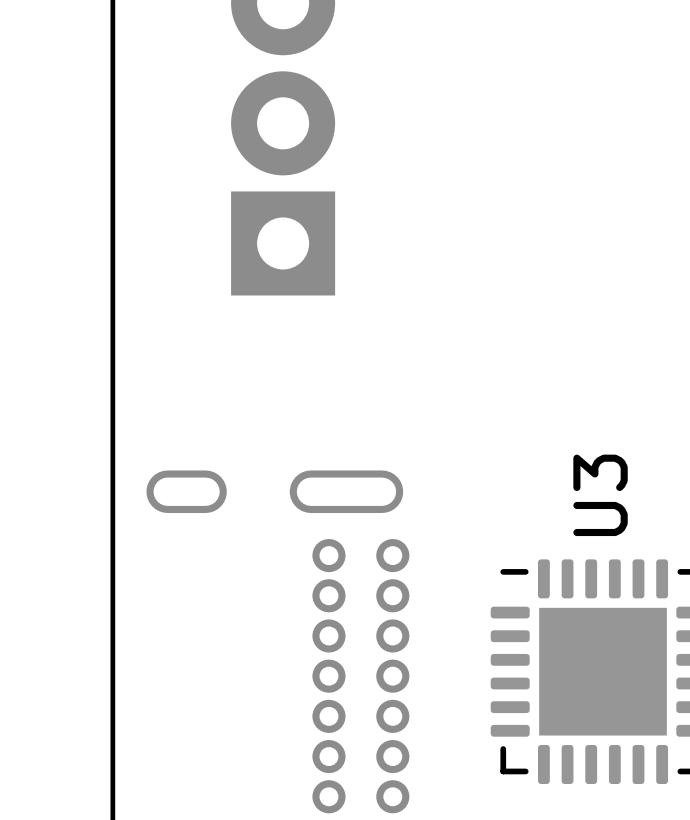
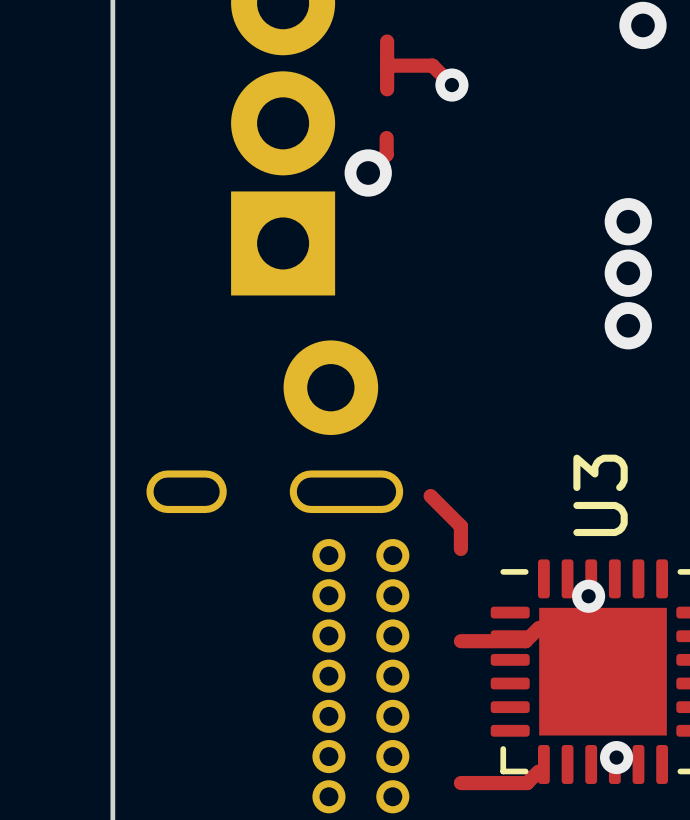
via: none -> (642, 25)
track: none -> (387, 41) (387, 89)
track: none -> (387, 65) (432, 65) (451, 85)
via: none -> (451, 85)
track: none -> (386, 138) (386, 154) (368, 173)
via: none -> (368, 173)
via: none -> (628, 221)
via: none -> (628, 273)
via: none -> (628, 325)
part: none -> (330, 387)
track: none -> (430, 495) (460, 526) (460, 548)
via: none -> (588, 596)
track: none -> (538, 627) (525, 641) (460, 641)
via: none -> (616, 757)
track: none -> (538, 771) (527, 783) (460, 783)

